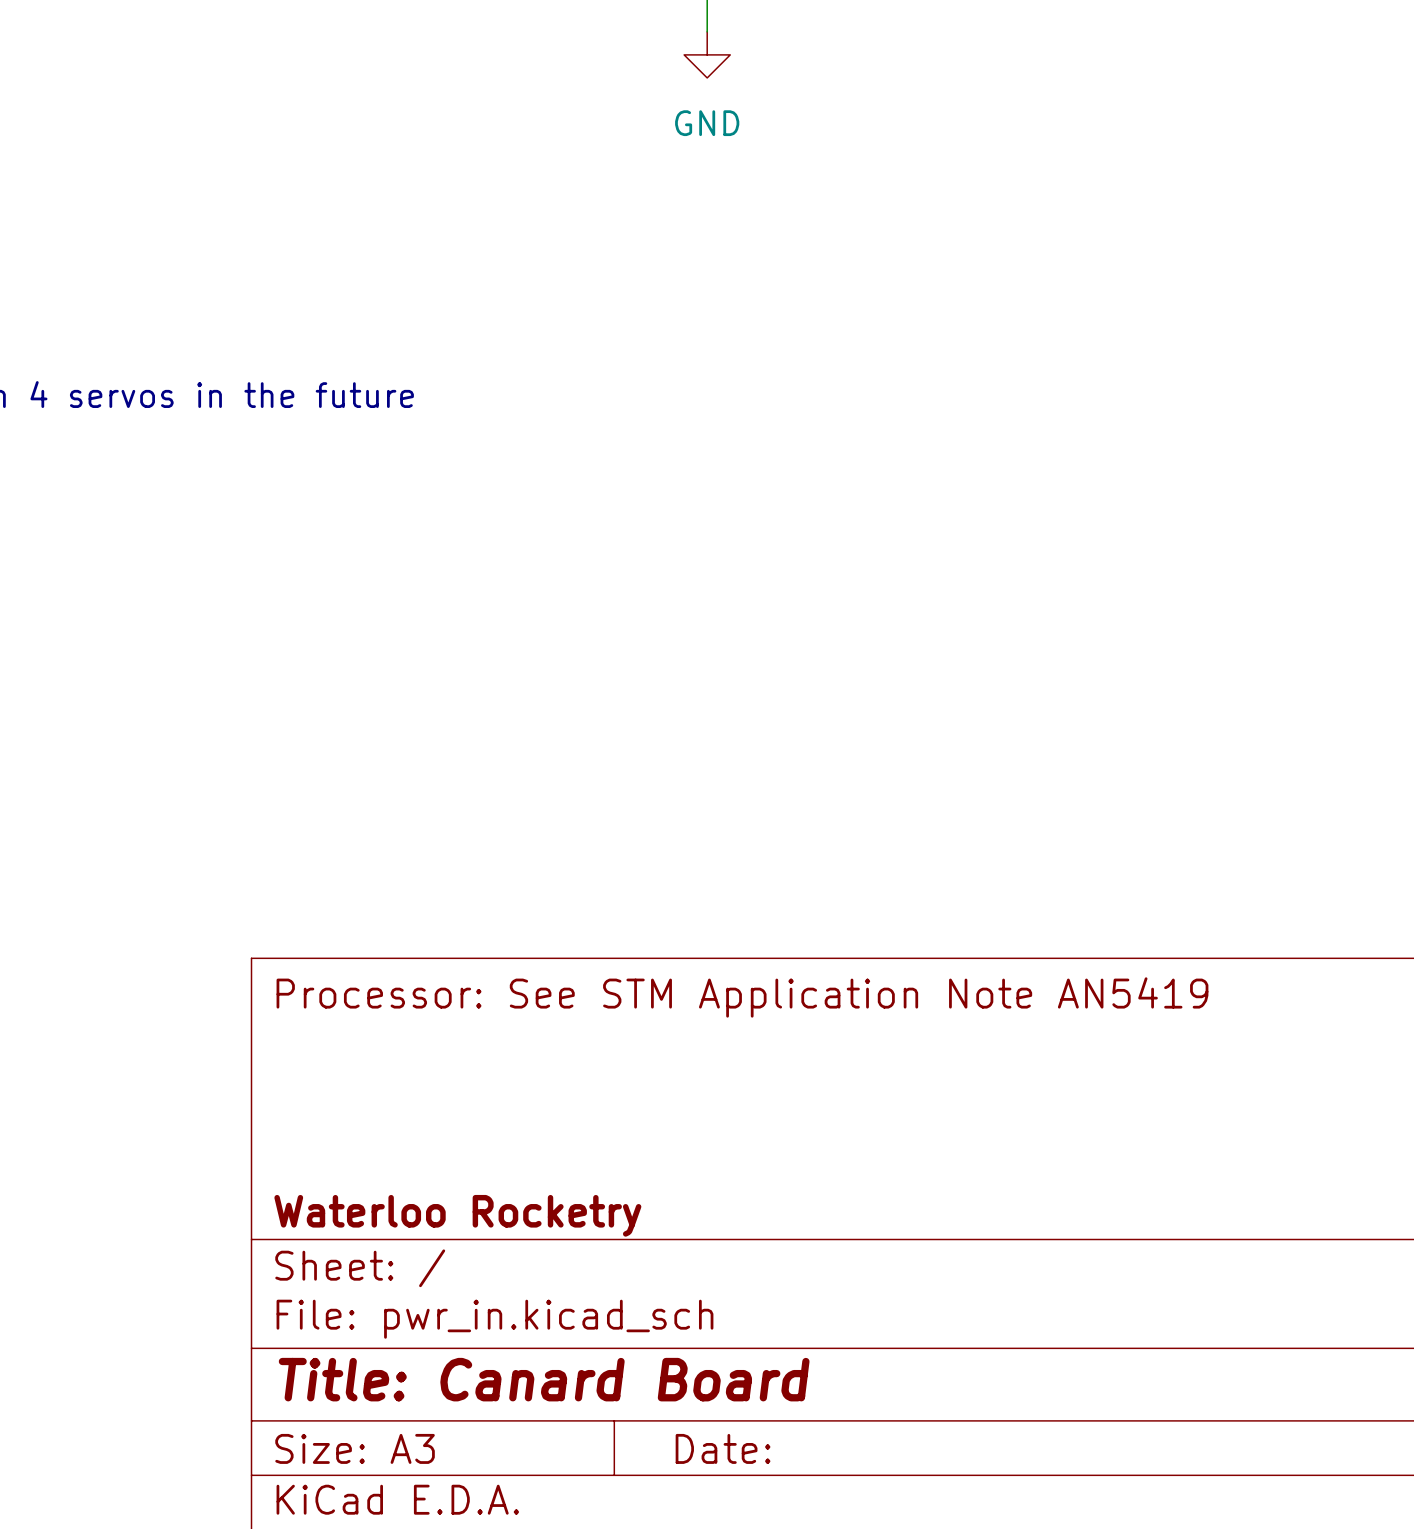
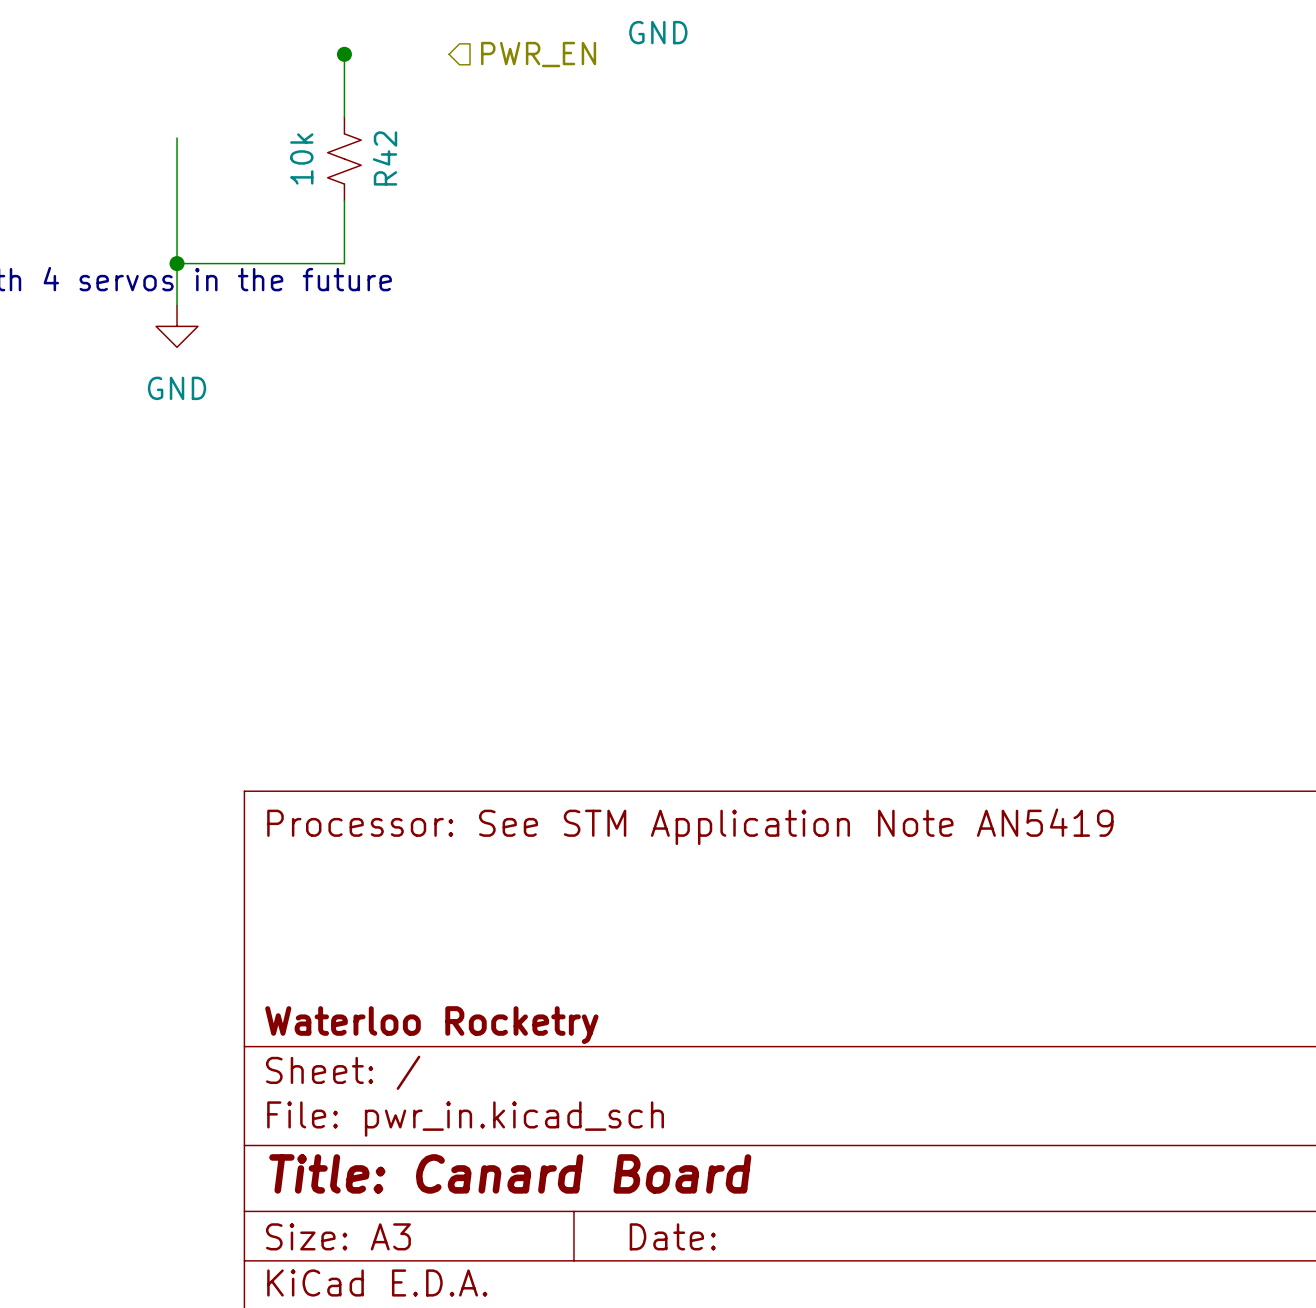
wire: none -> (344, 54) (344, 117)
junction: none -> (344, 54)
hierarchical label: none -> PWR_EN (538, 54)
wire: none -> (177, 138) (177, 305)
R42: none -> 10k (344, 158)
wire: none -> (344, 200) (344, 263) (177, 263)
junction: none -> (177, 263)
power symbol: none -> GND (177, 326)

